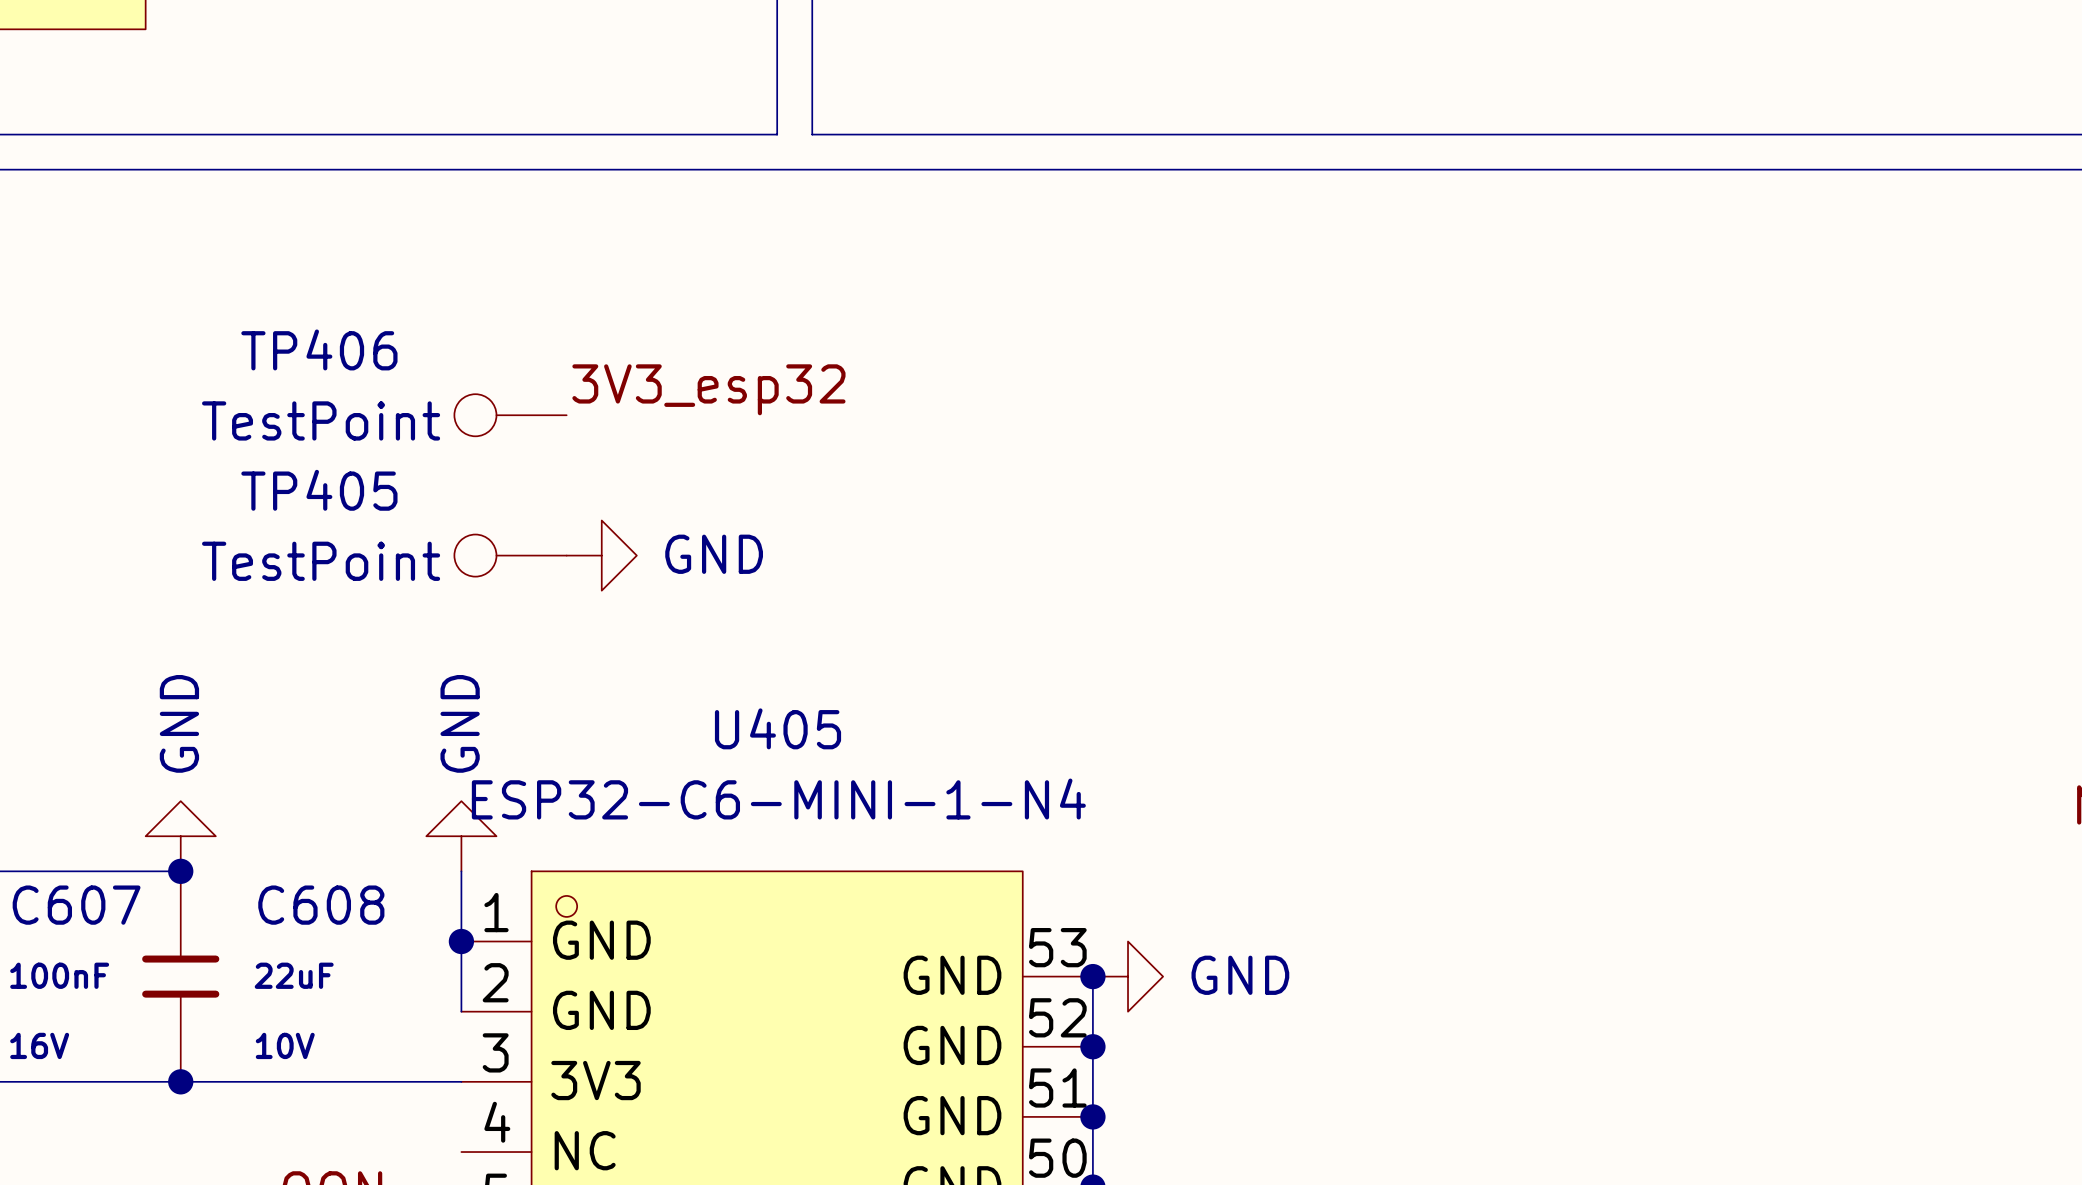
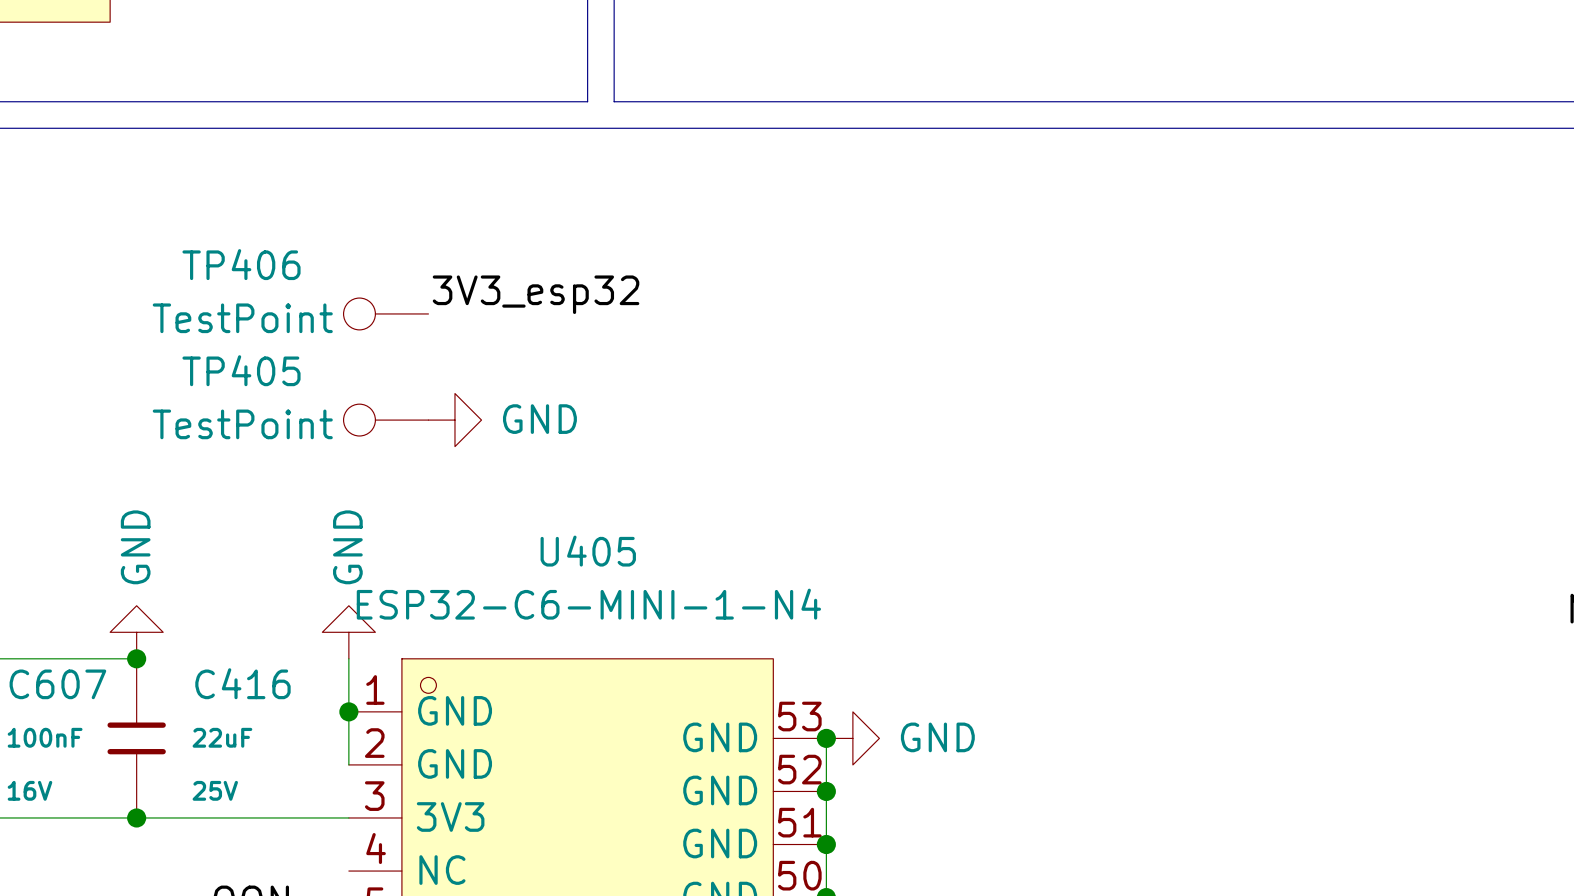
C608 name: C608 (321, 905) -> C416 (242, 683)
C608 text: 10V (285, 1045) -> 25V (215, 790)

